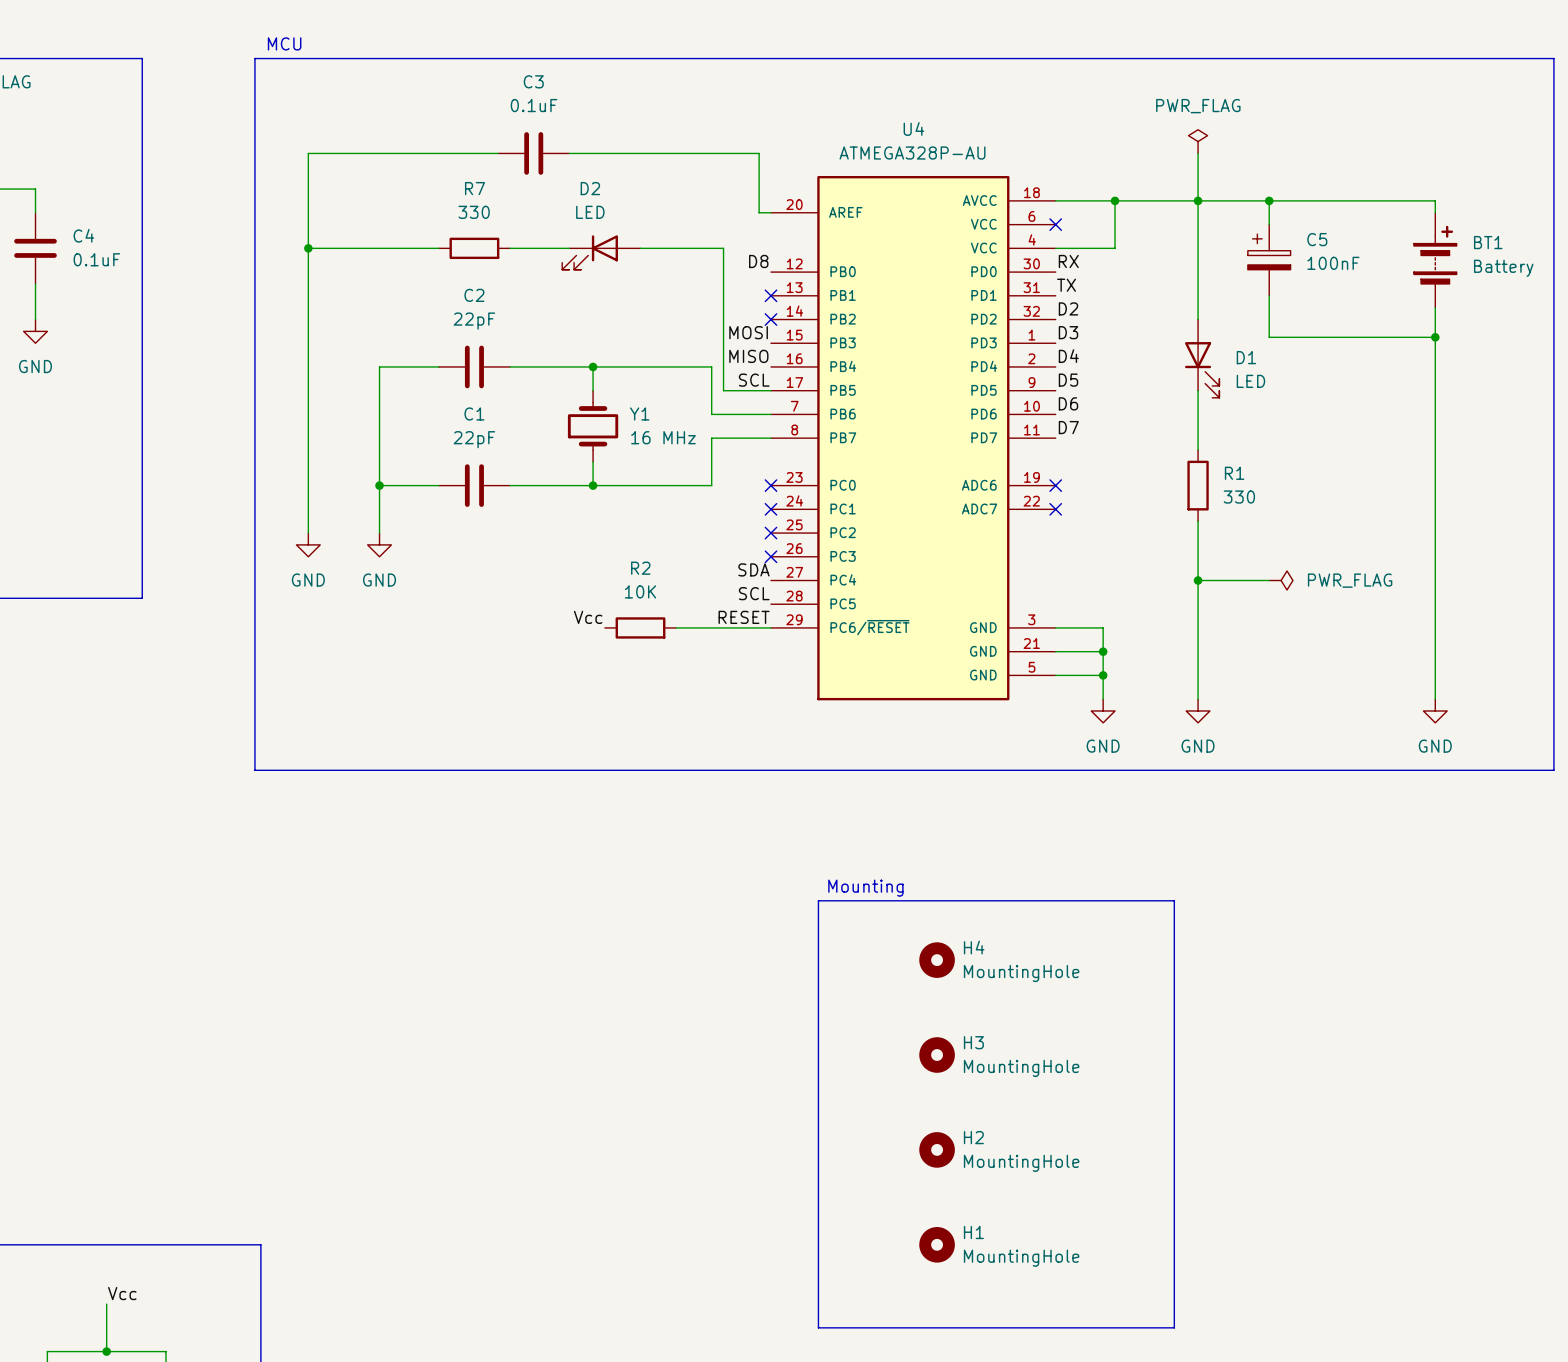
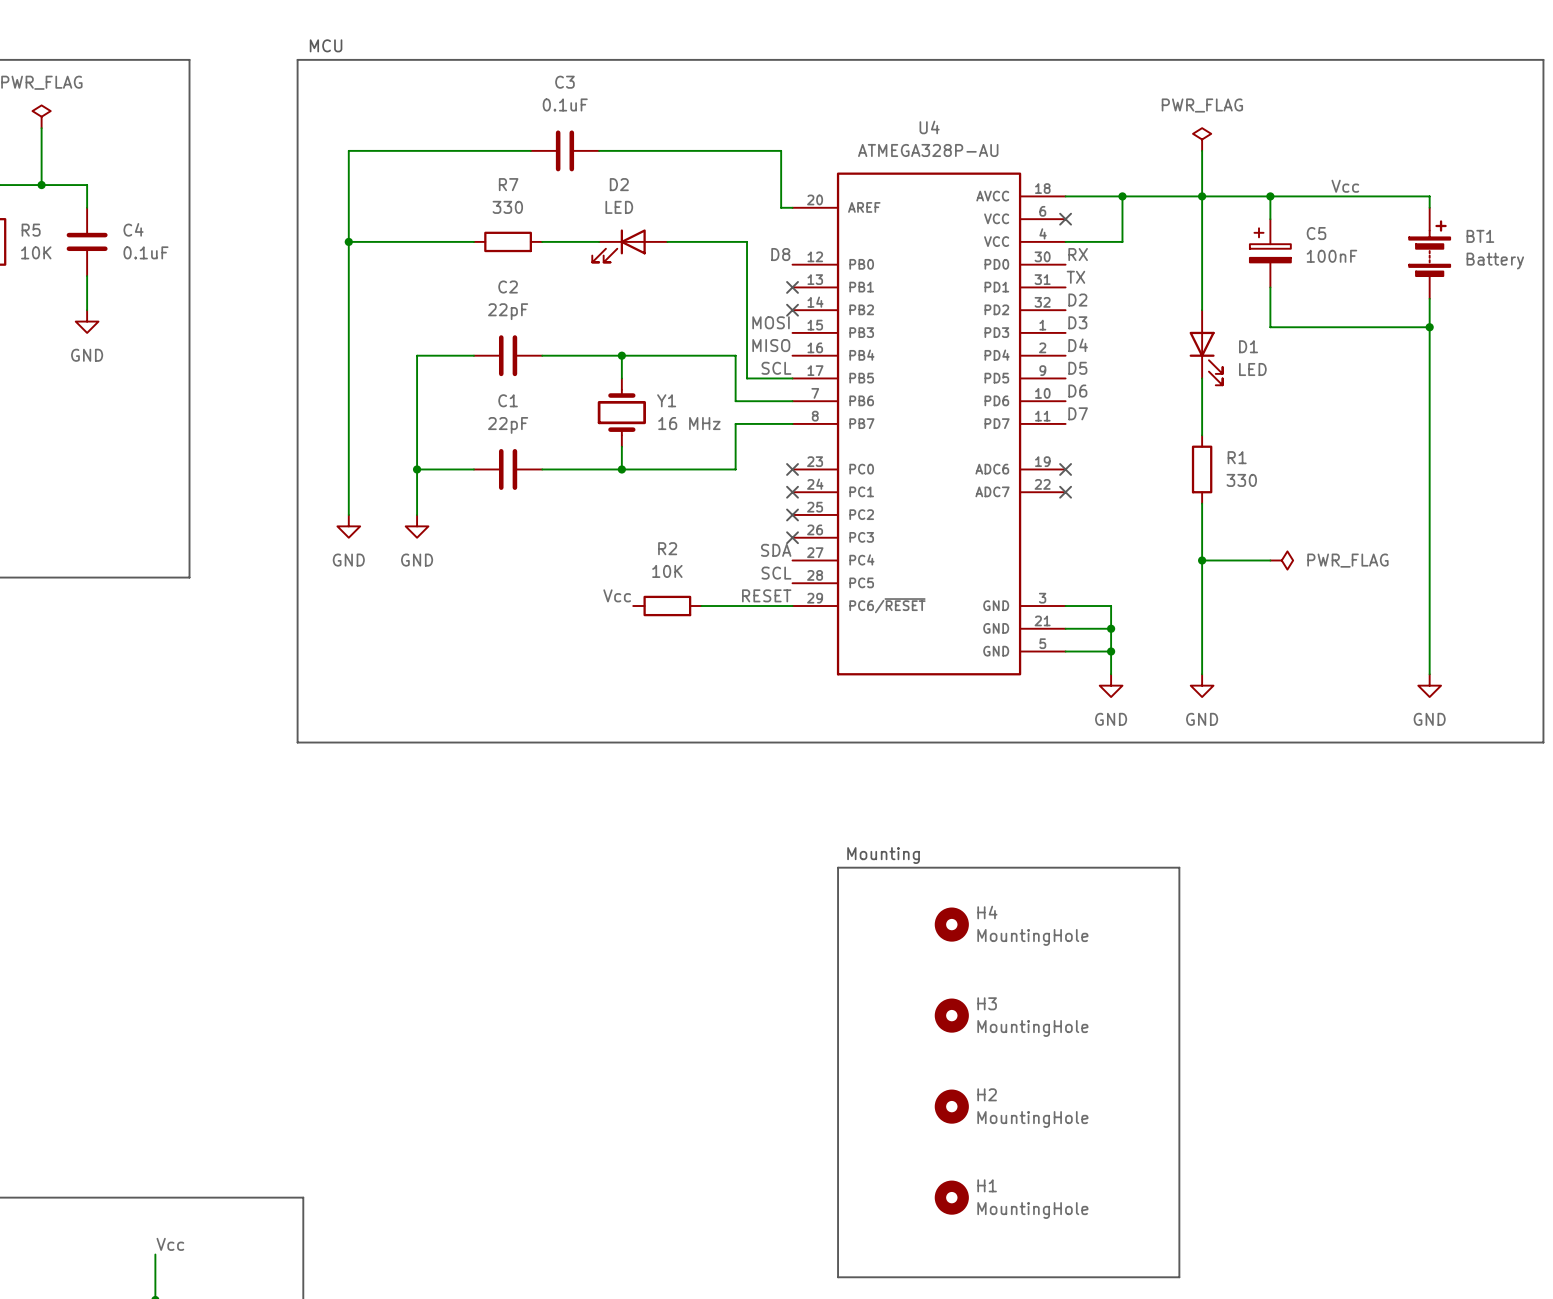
label: none -> Vcc (1345, 186)

